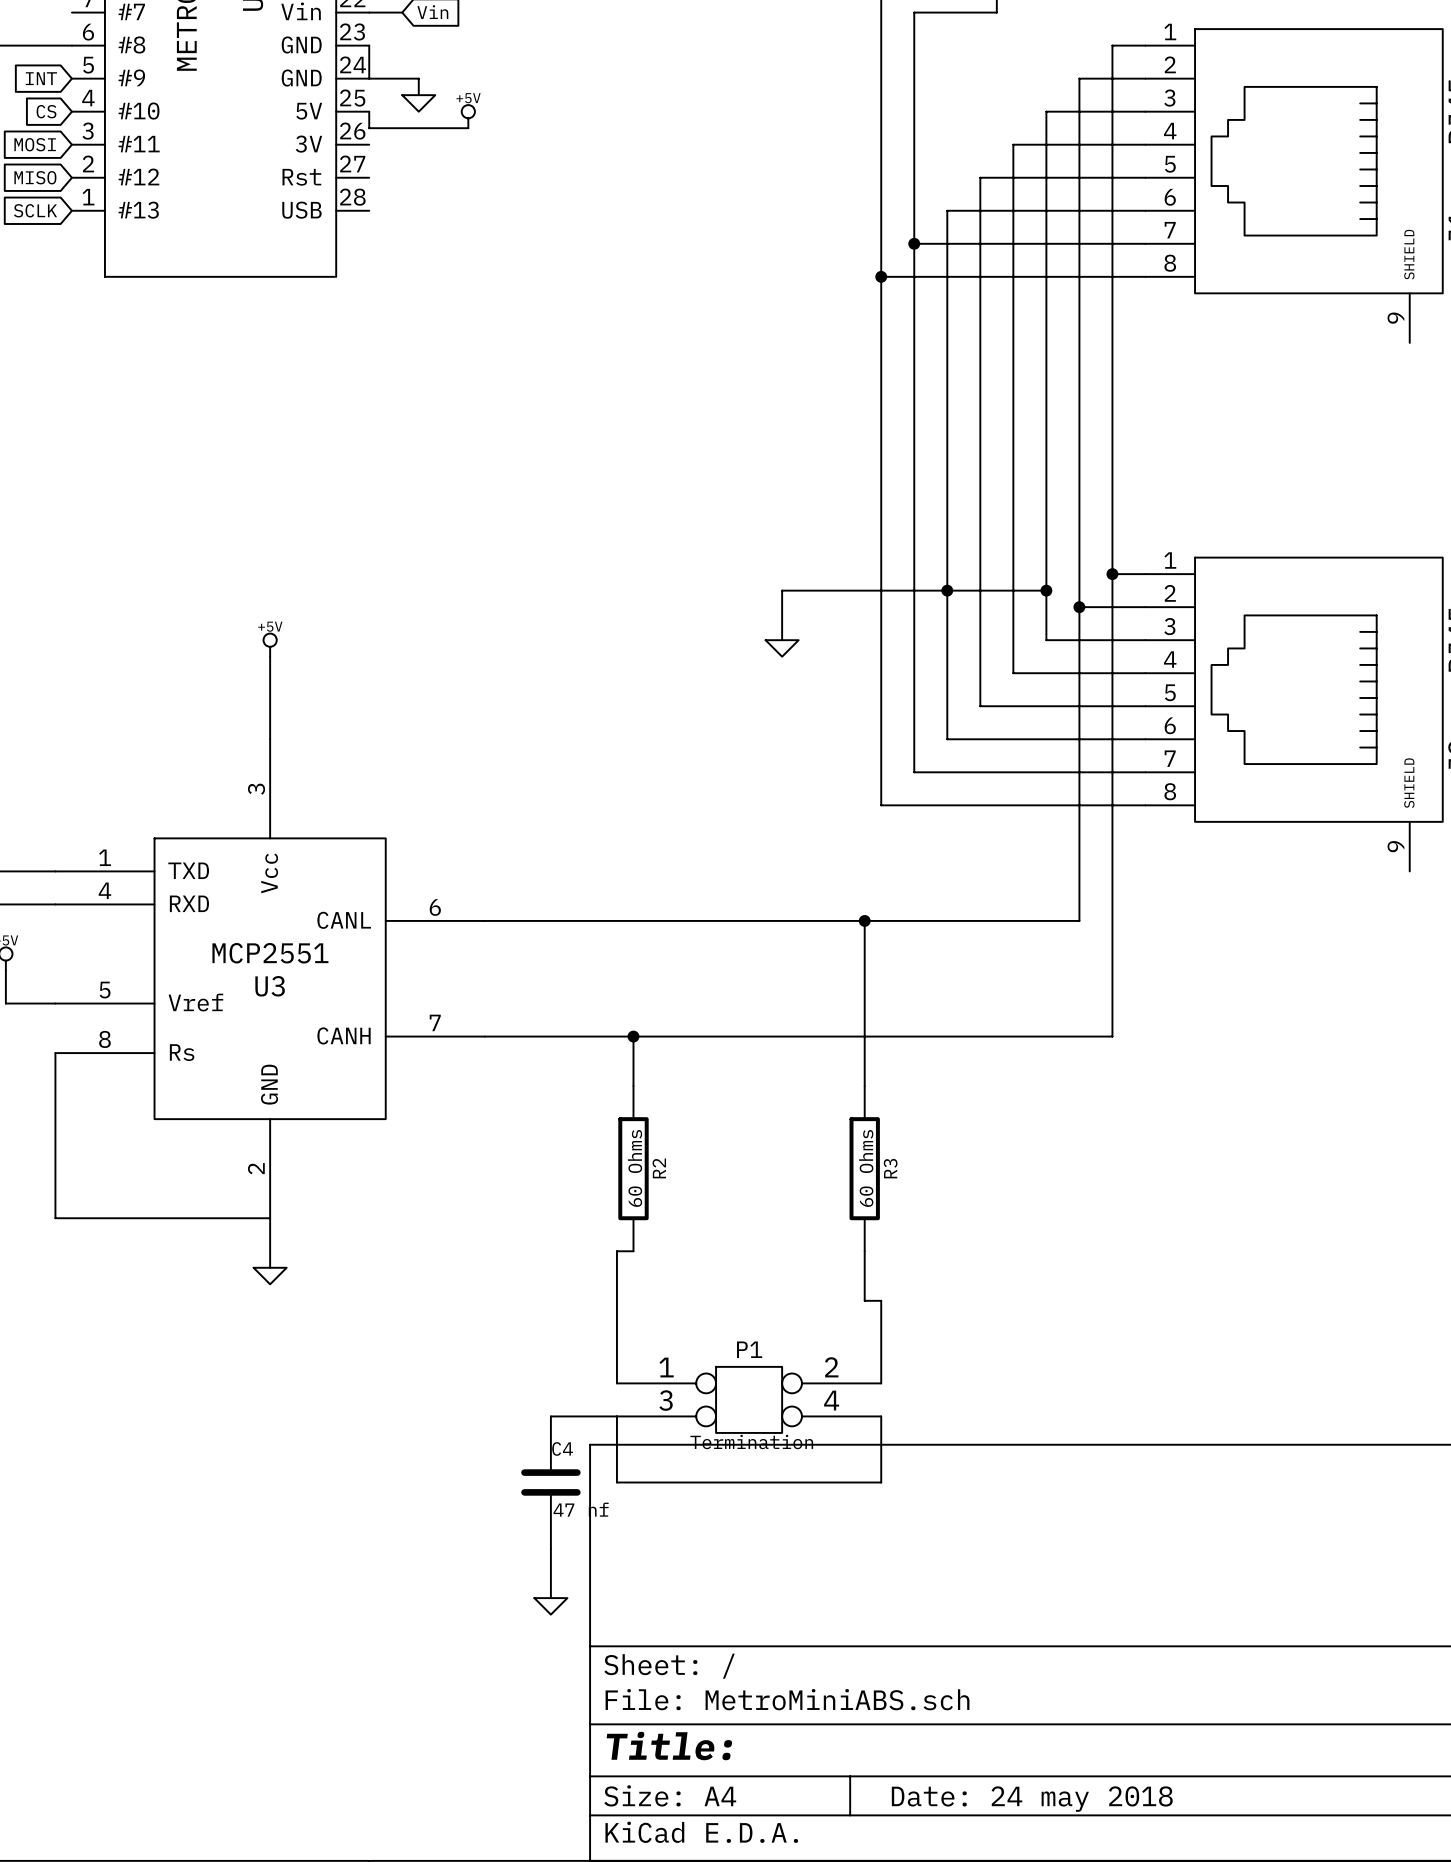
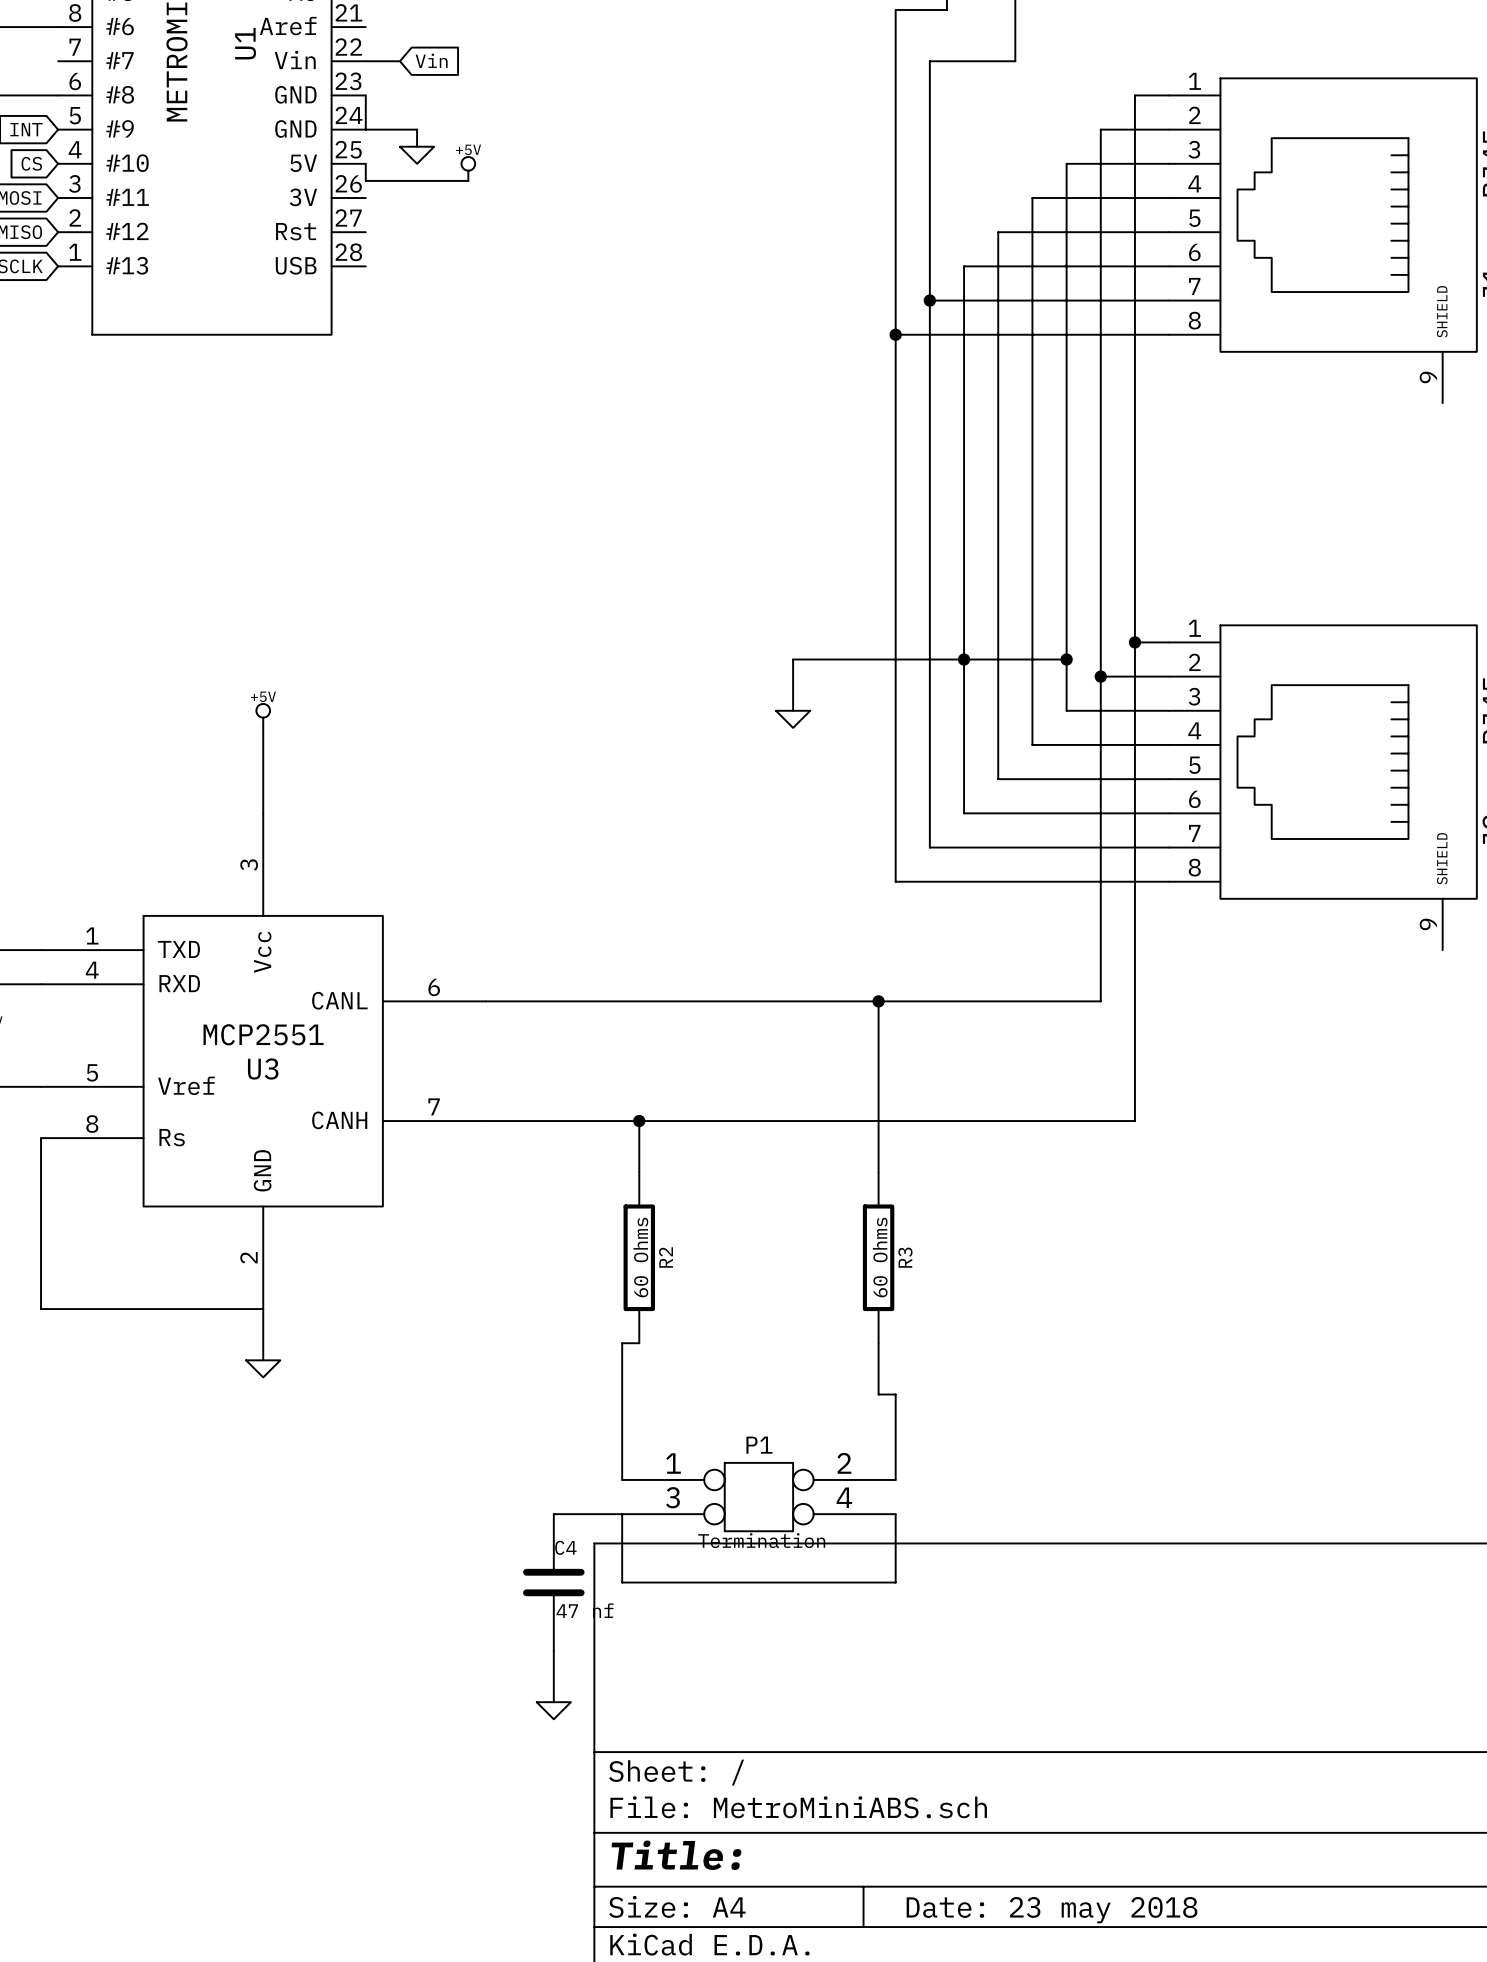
title block: Date: 24 may 2018 (1032, 1799) -> Date: 23 may 2018 (1052, 1910)

